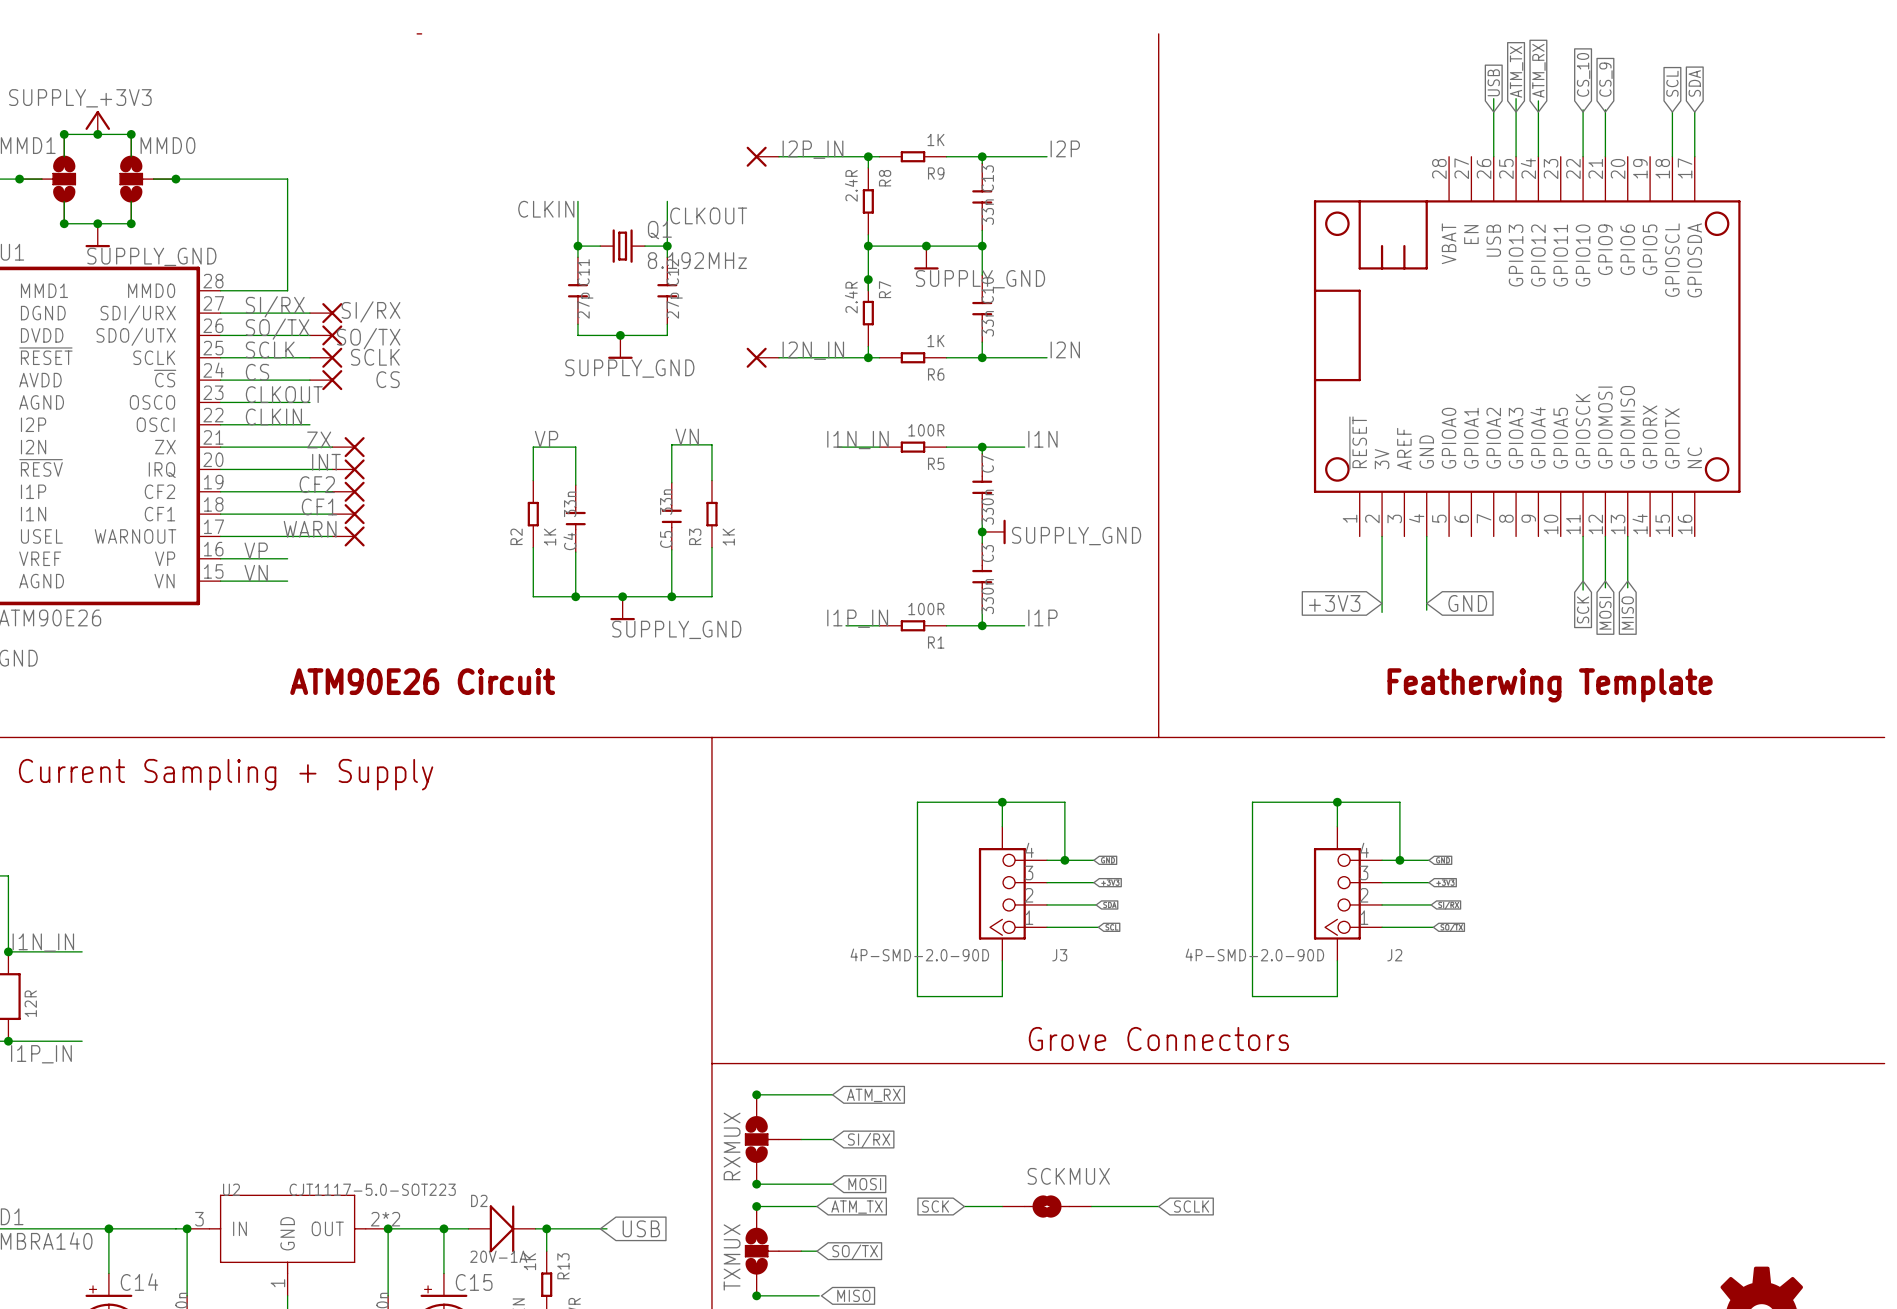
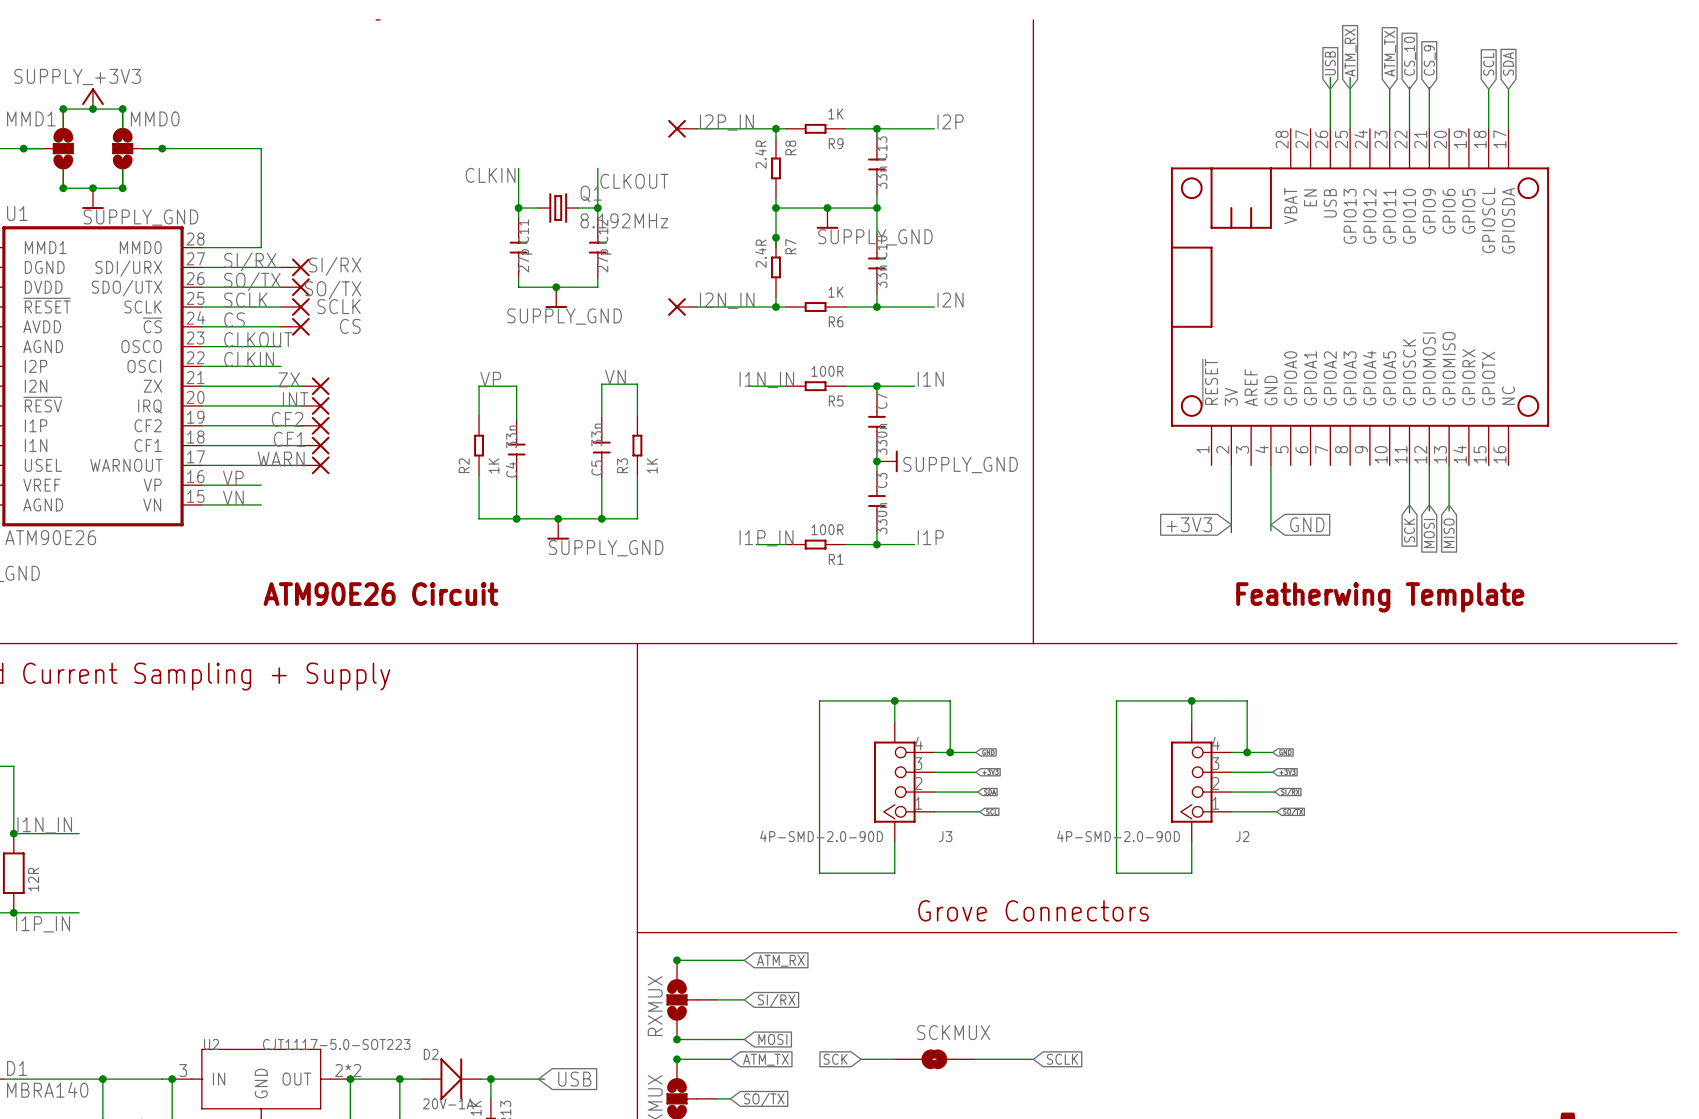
global label: ATM_RX (1538, 70) -> ATM_TX (1390, 53)
global label: ATM_TX (1516, 71) -> ATM_RX (1350, 52)
wire: (1538, 100) (1538, 156) -> none
wire: none -> (1389, 89) (1389, 128)

